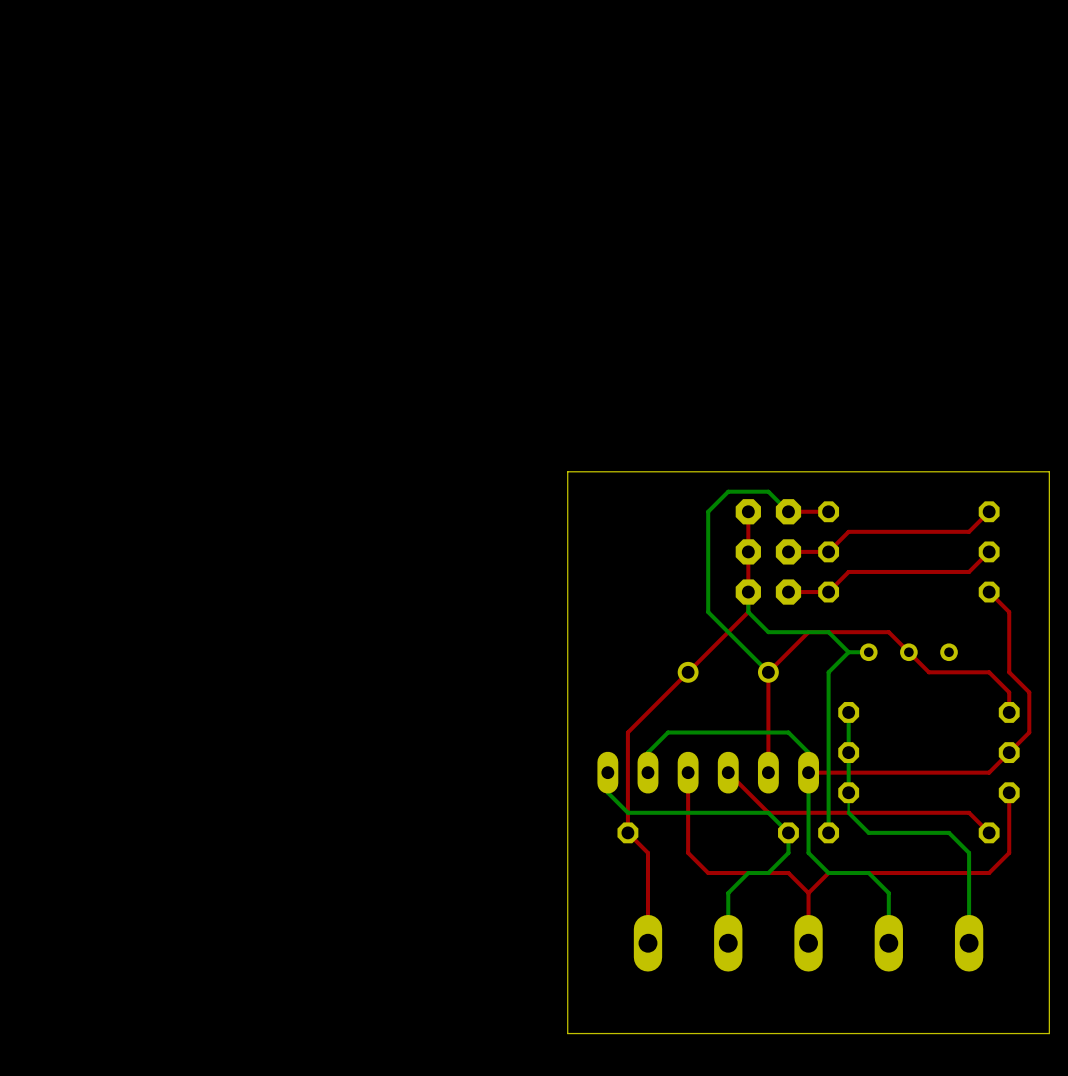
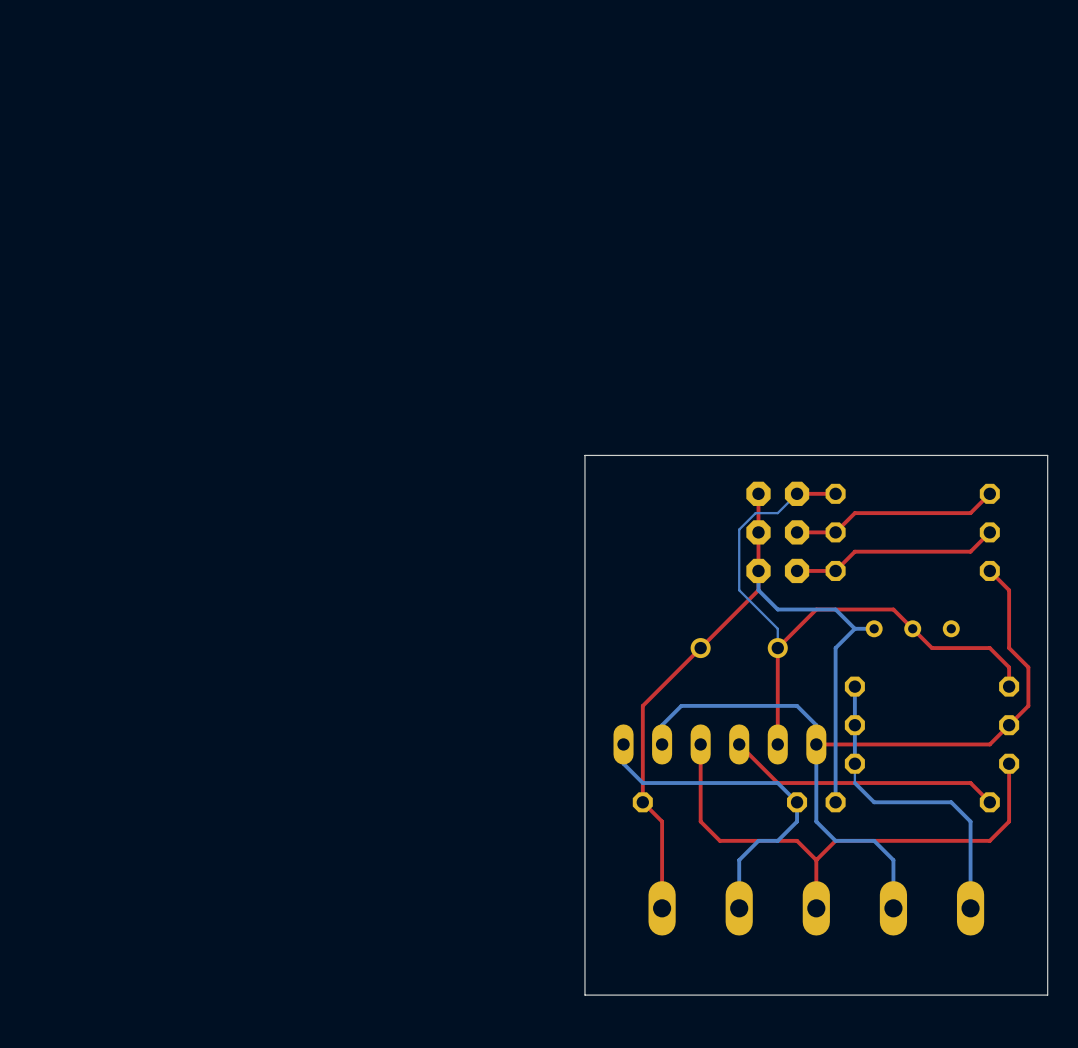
bottom track: (788, 511) (768, 491) (728, 491) (708, 511) (708, 612) (768, 672) -> (797, 493) (777, 513) (755, 513) (739, 529) (739, 590) (777, 628) (777, 648)

